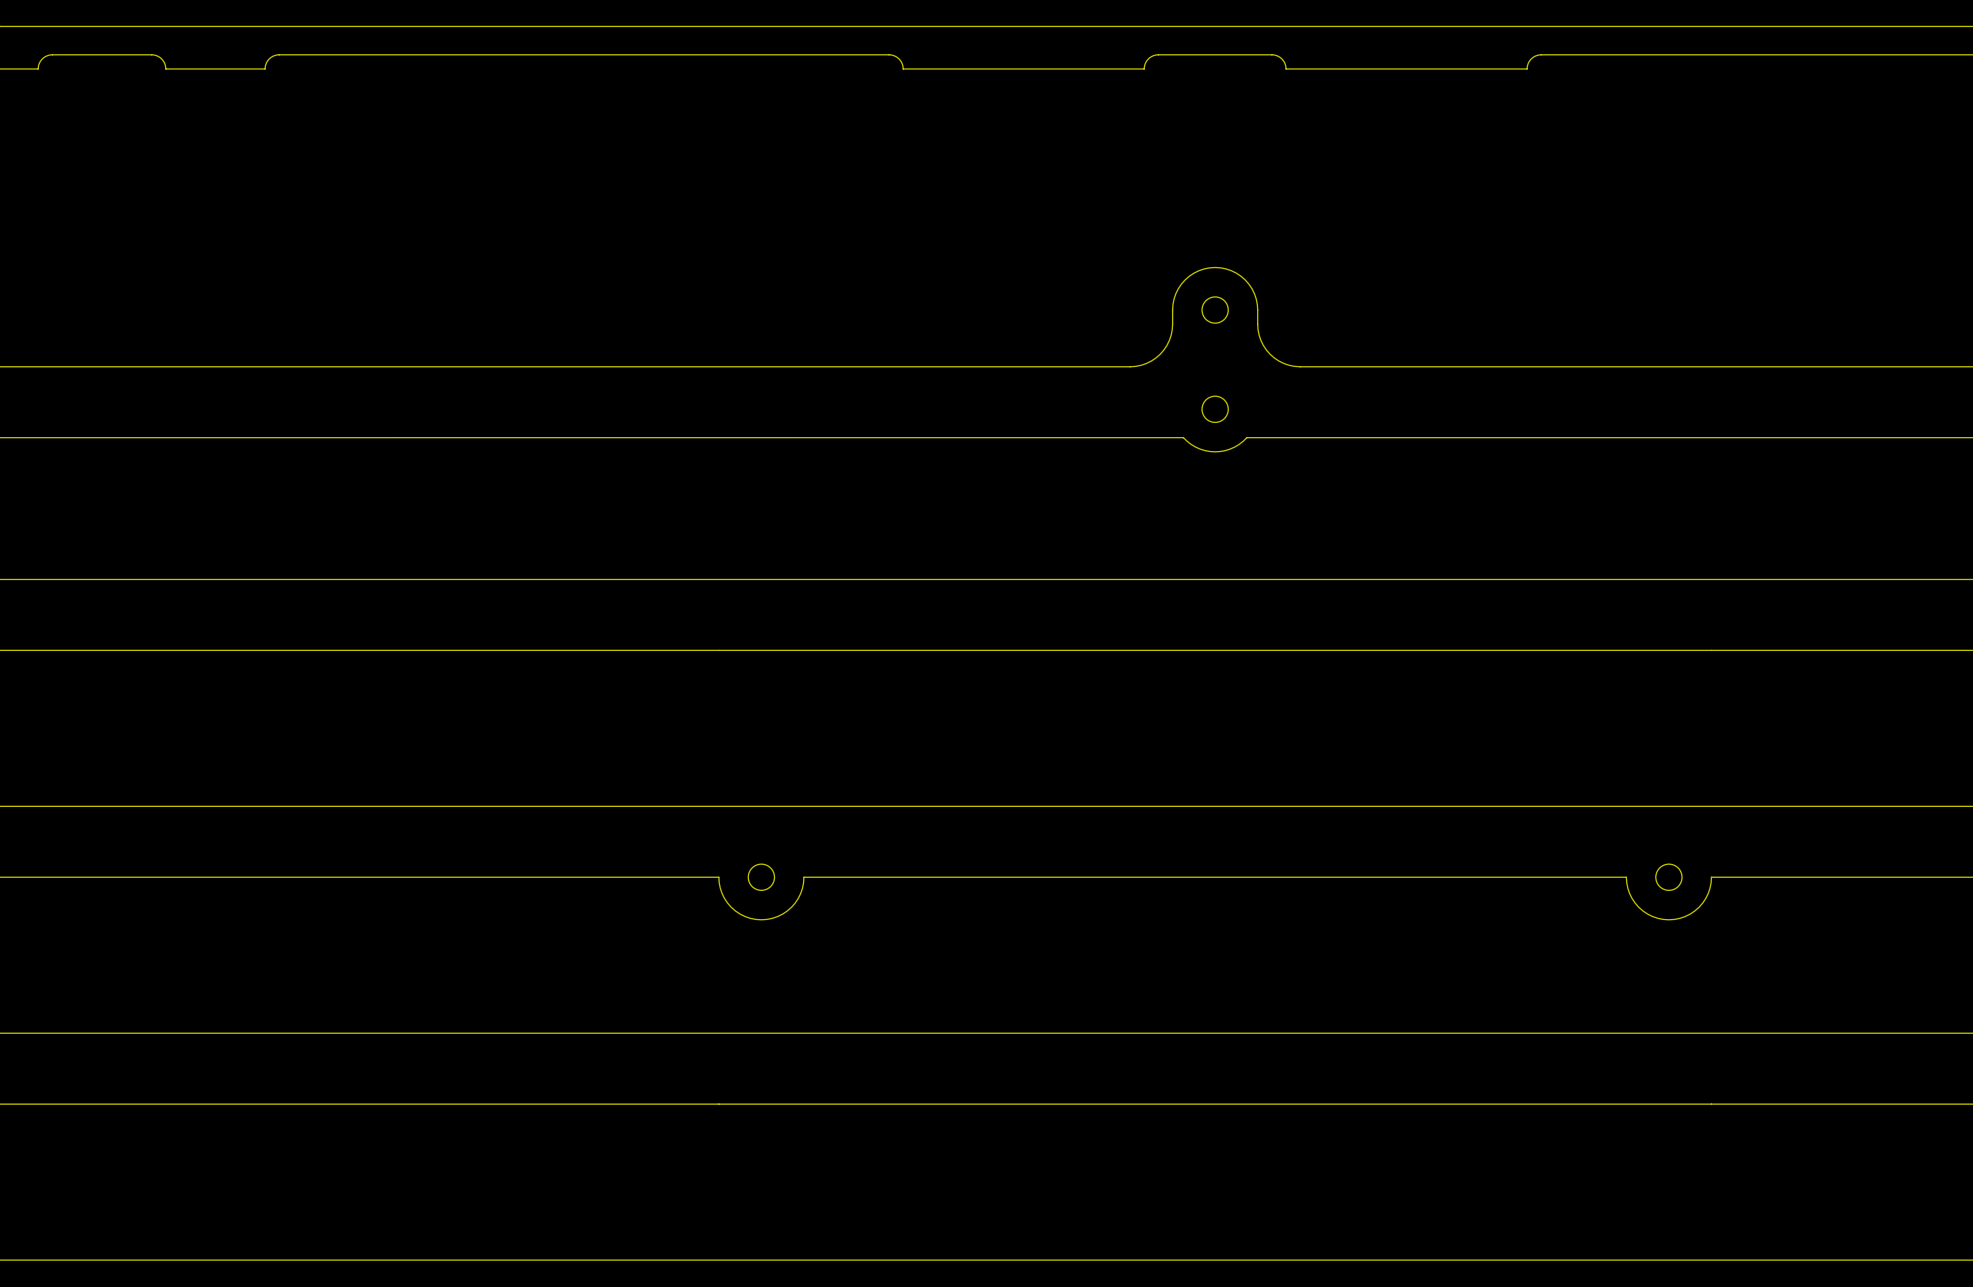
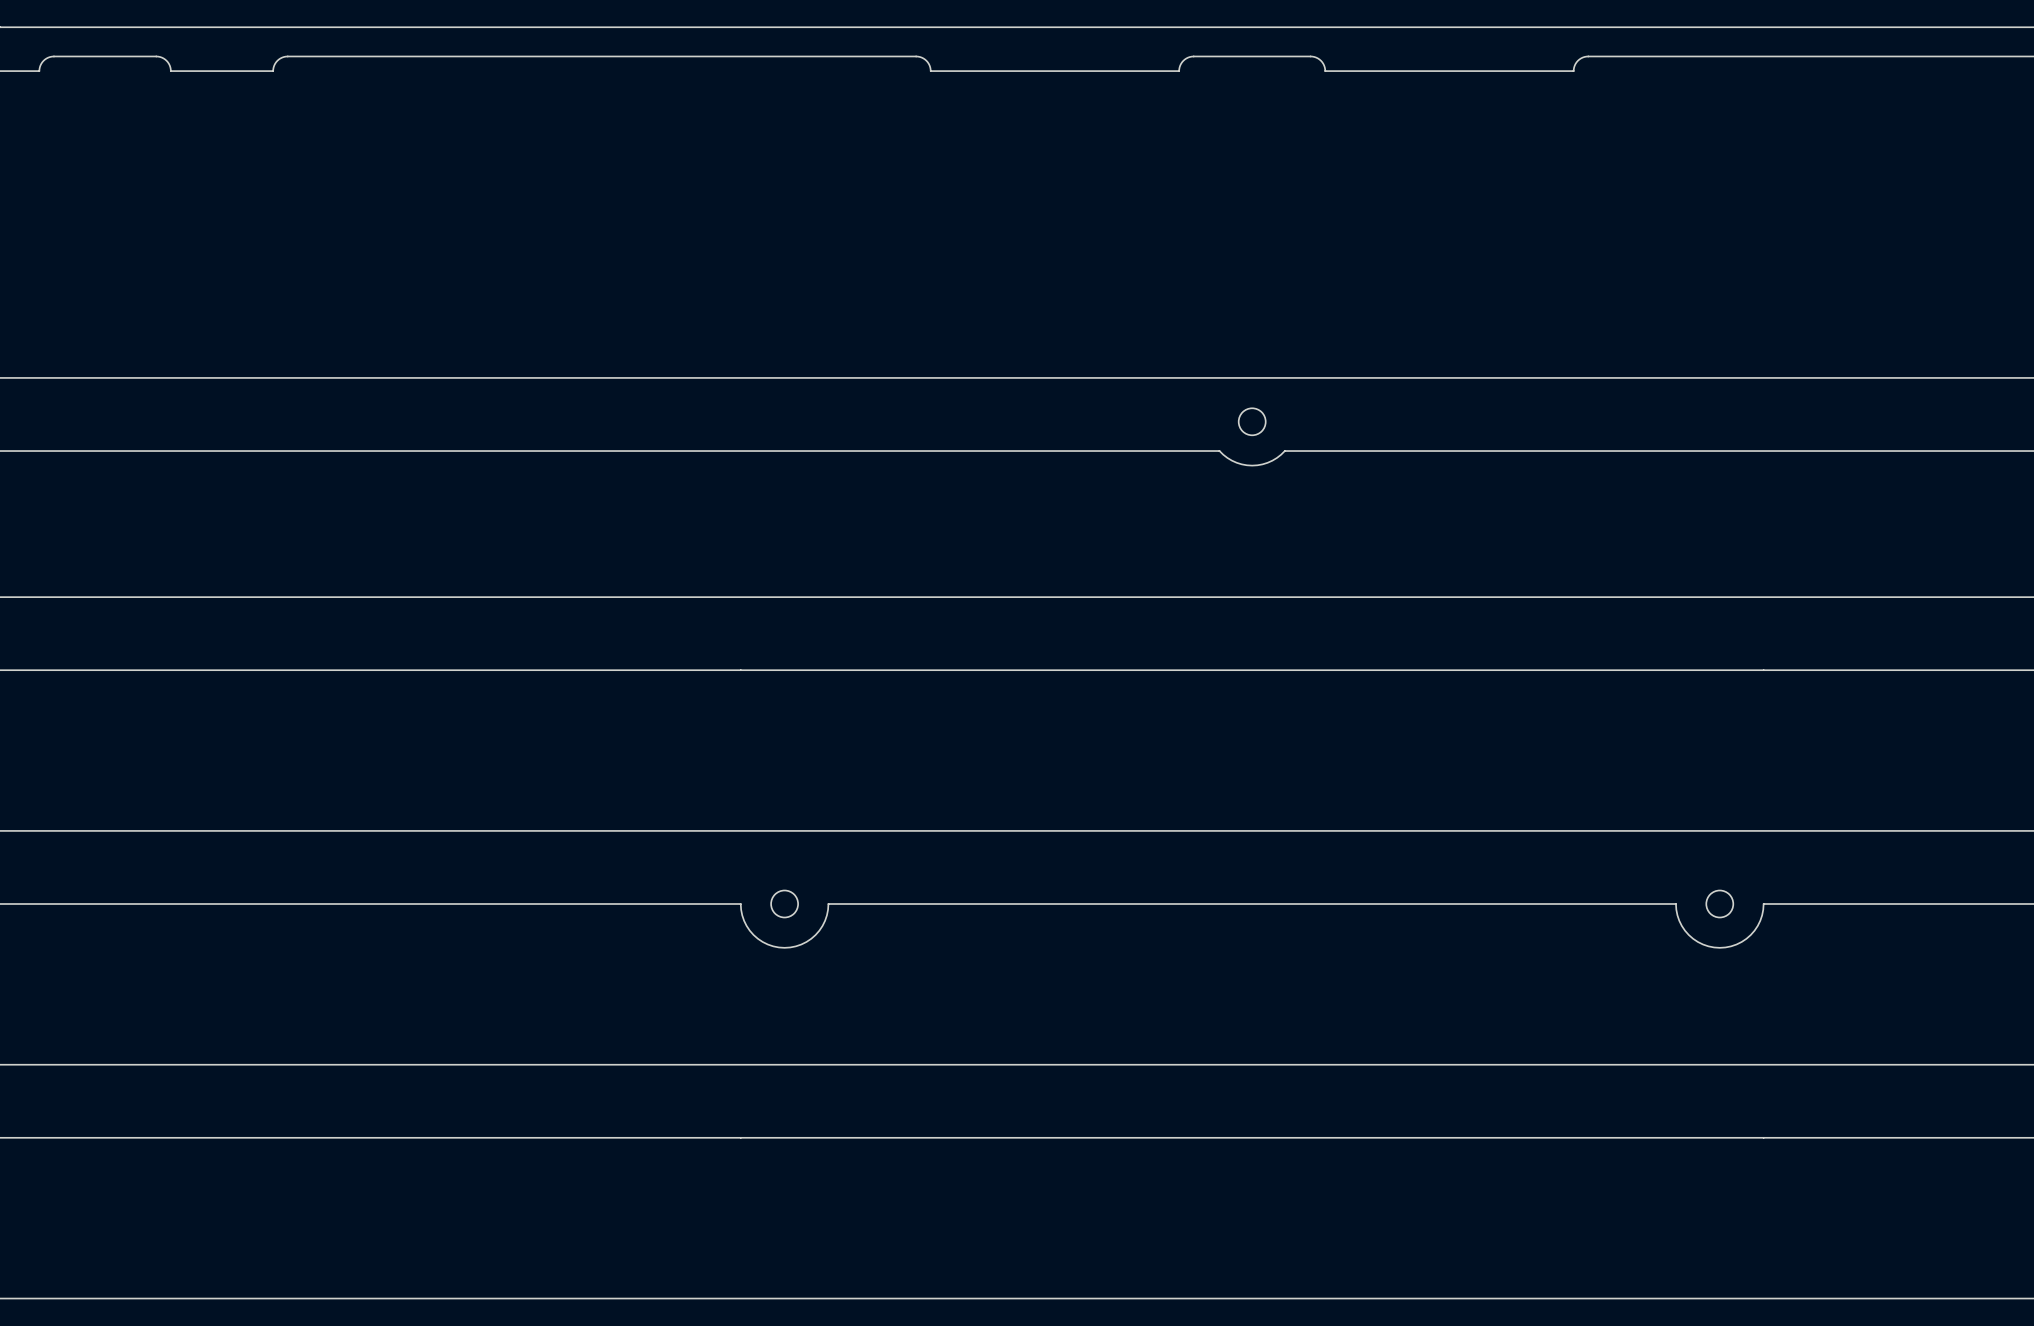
round board edge: [1201, 296, 1229, 324] -> none
board edge: (1130, 366) (1146, 363) (1163, 350) (1171, 335) (1172, 304) (1178, 288) (1193, 273) (1215, 267) (1231, 270) (1248, 284) (1256, 299) (1258, 329) (1263, 345) (1278, 361) (1300, 366) -> (1164, 377) (1339, 377)

